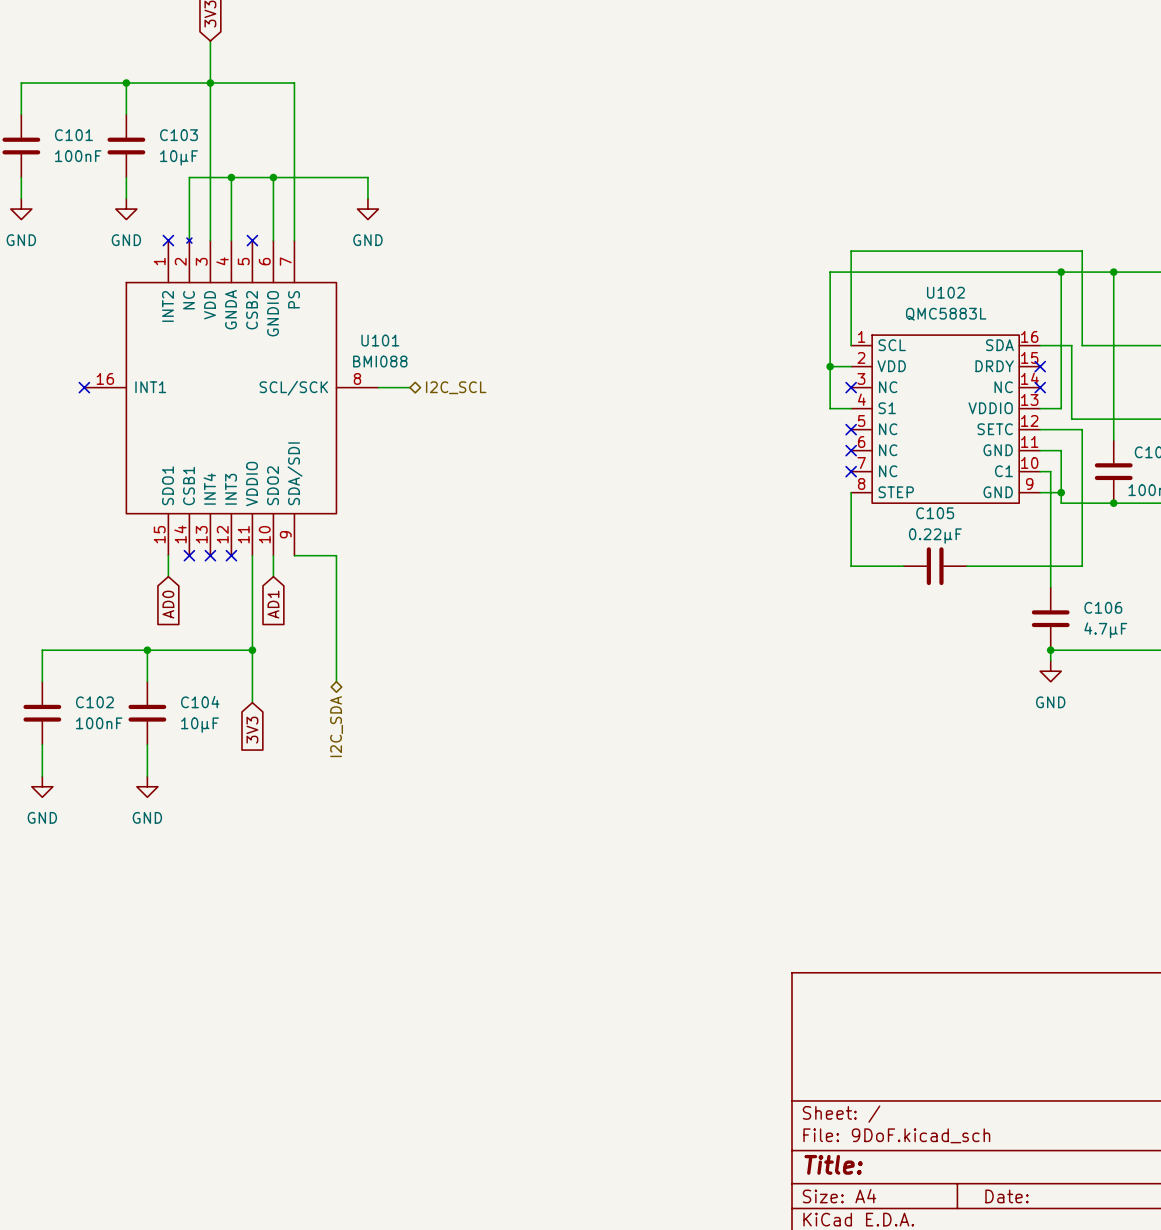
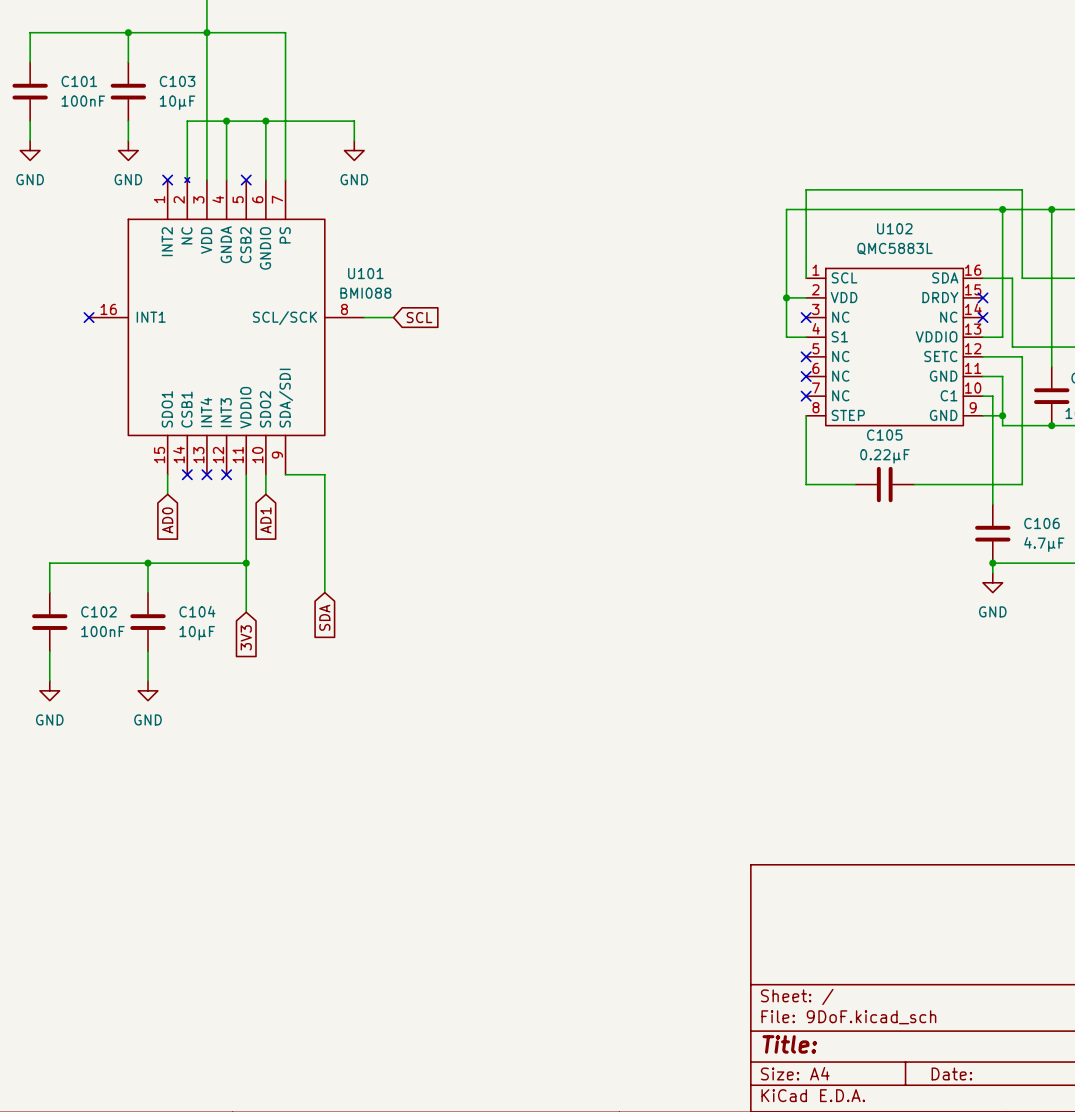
global label: none -> SCL (419, 317)
hierarchical label: I2C_SCL (456, 387) -> none
global label: none -> SDA (324, 617)
hierarchical label: I2C_SDA (336, 726) -> none

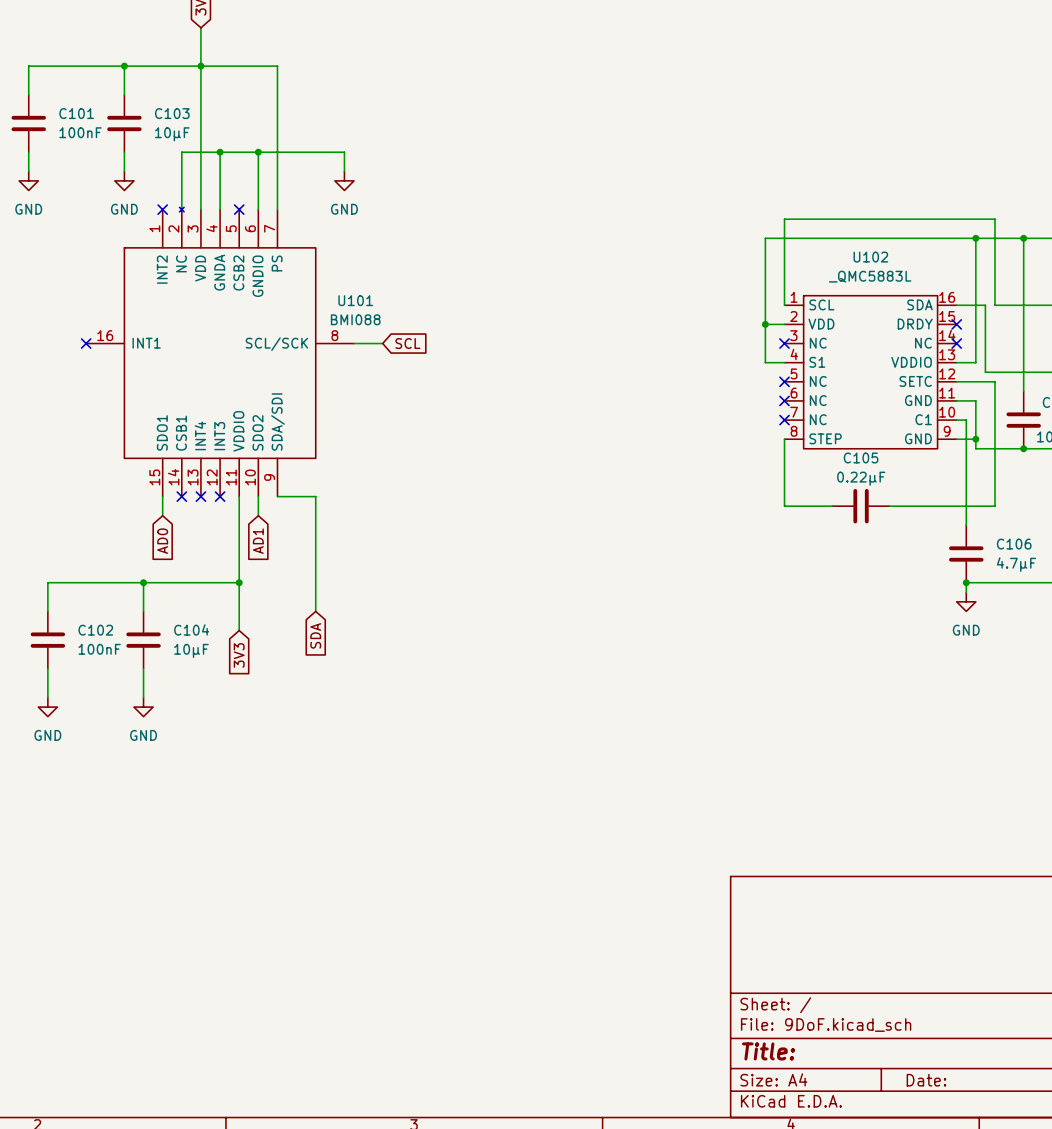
U102 text: none -> _QMC5883L (870, 276)
U102 value: QMC5883L (895, 248) -> none

